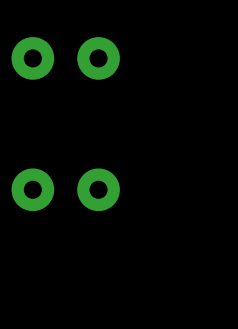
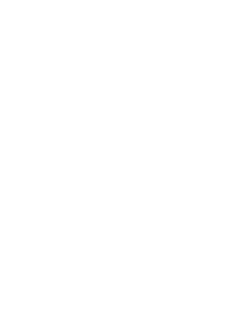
part: (65, 58) -> none
part: (65, 189) -> none

